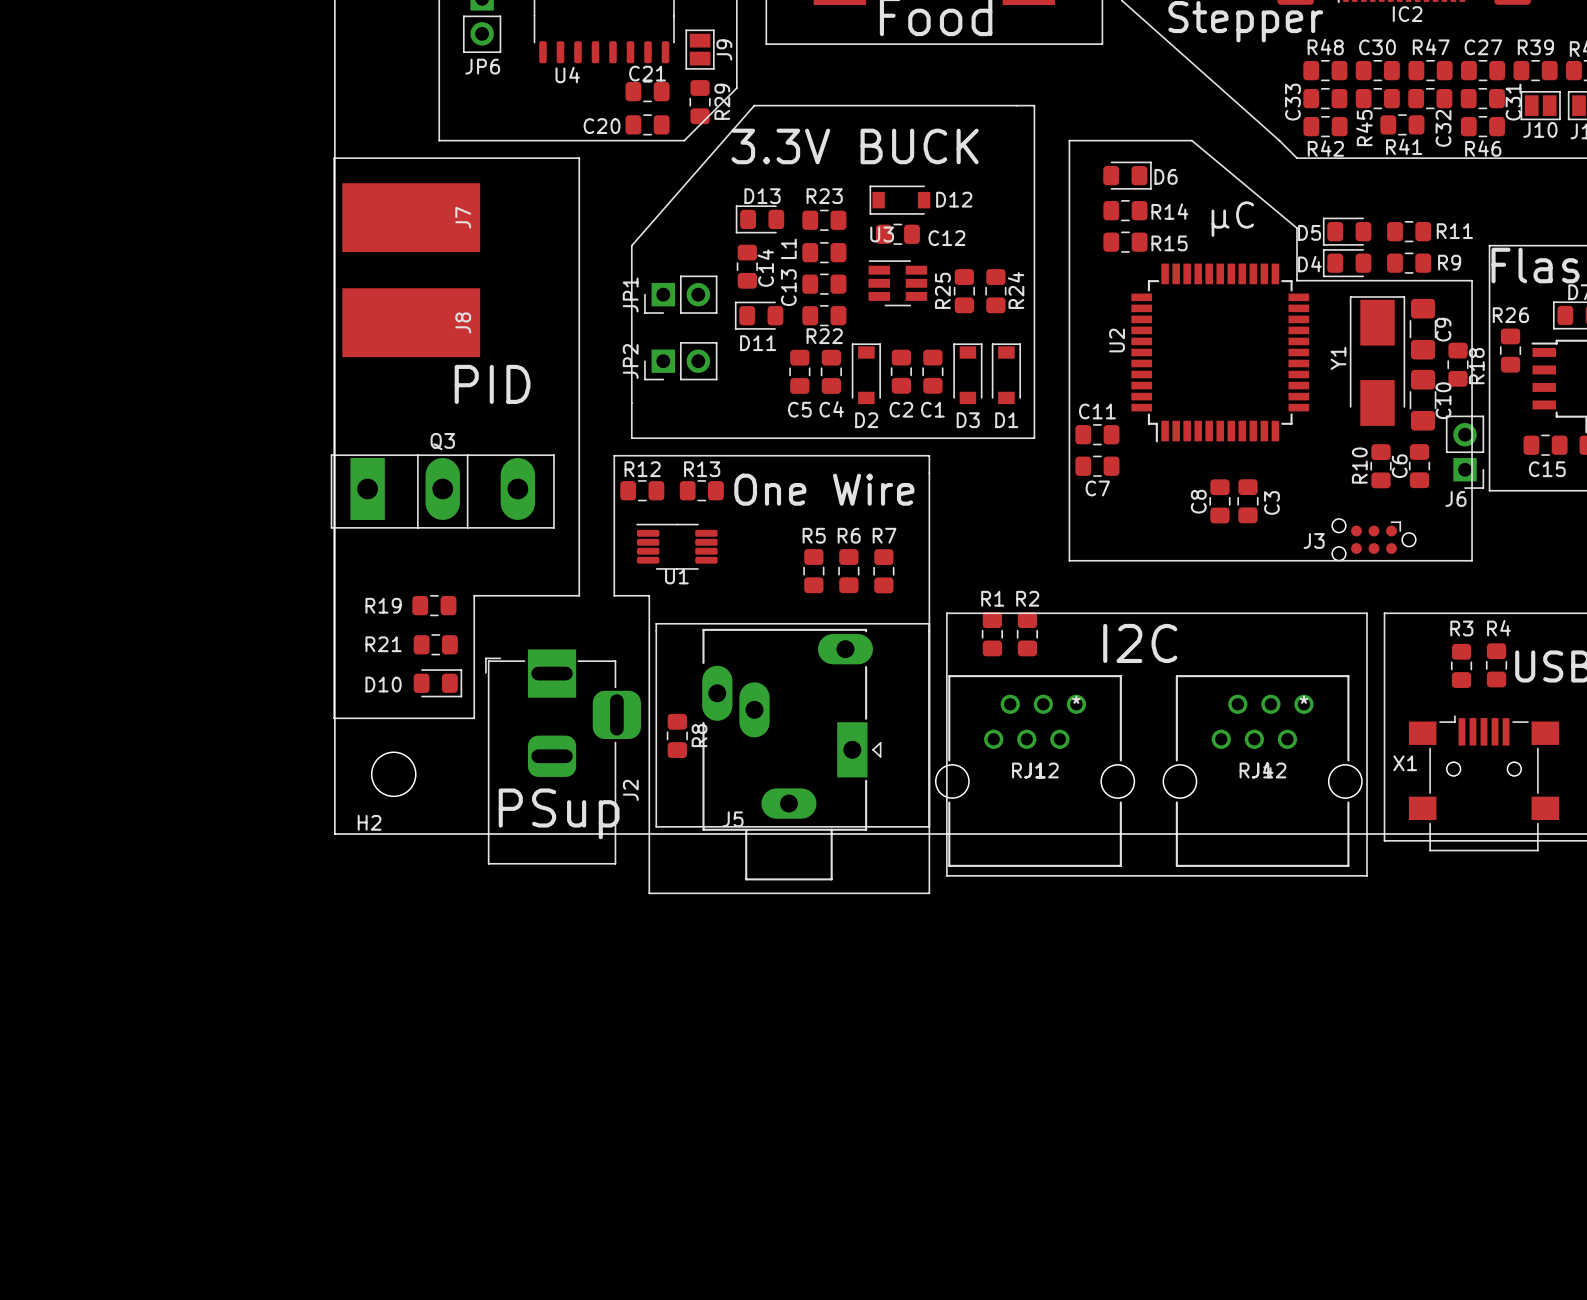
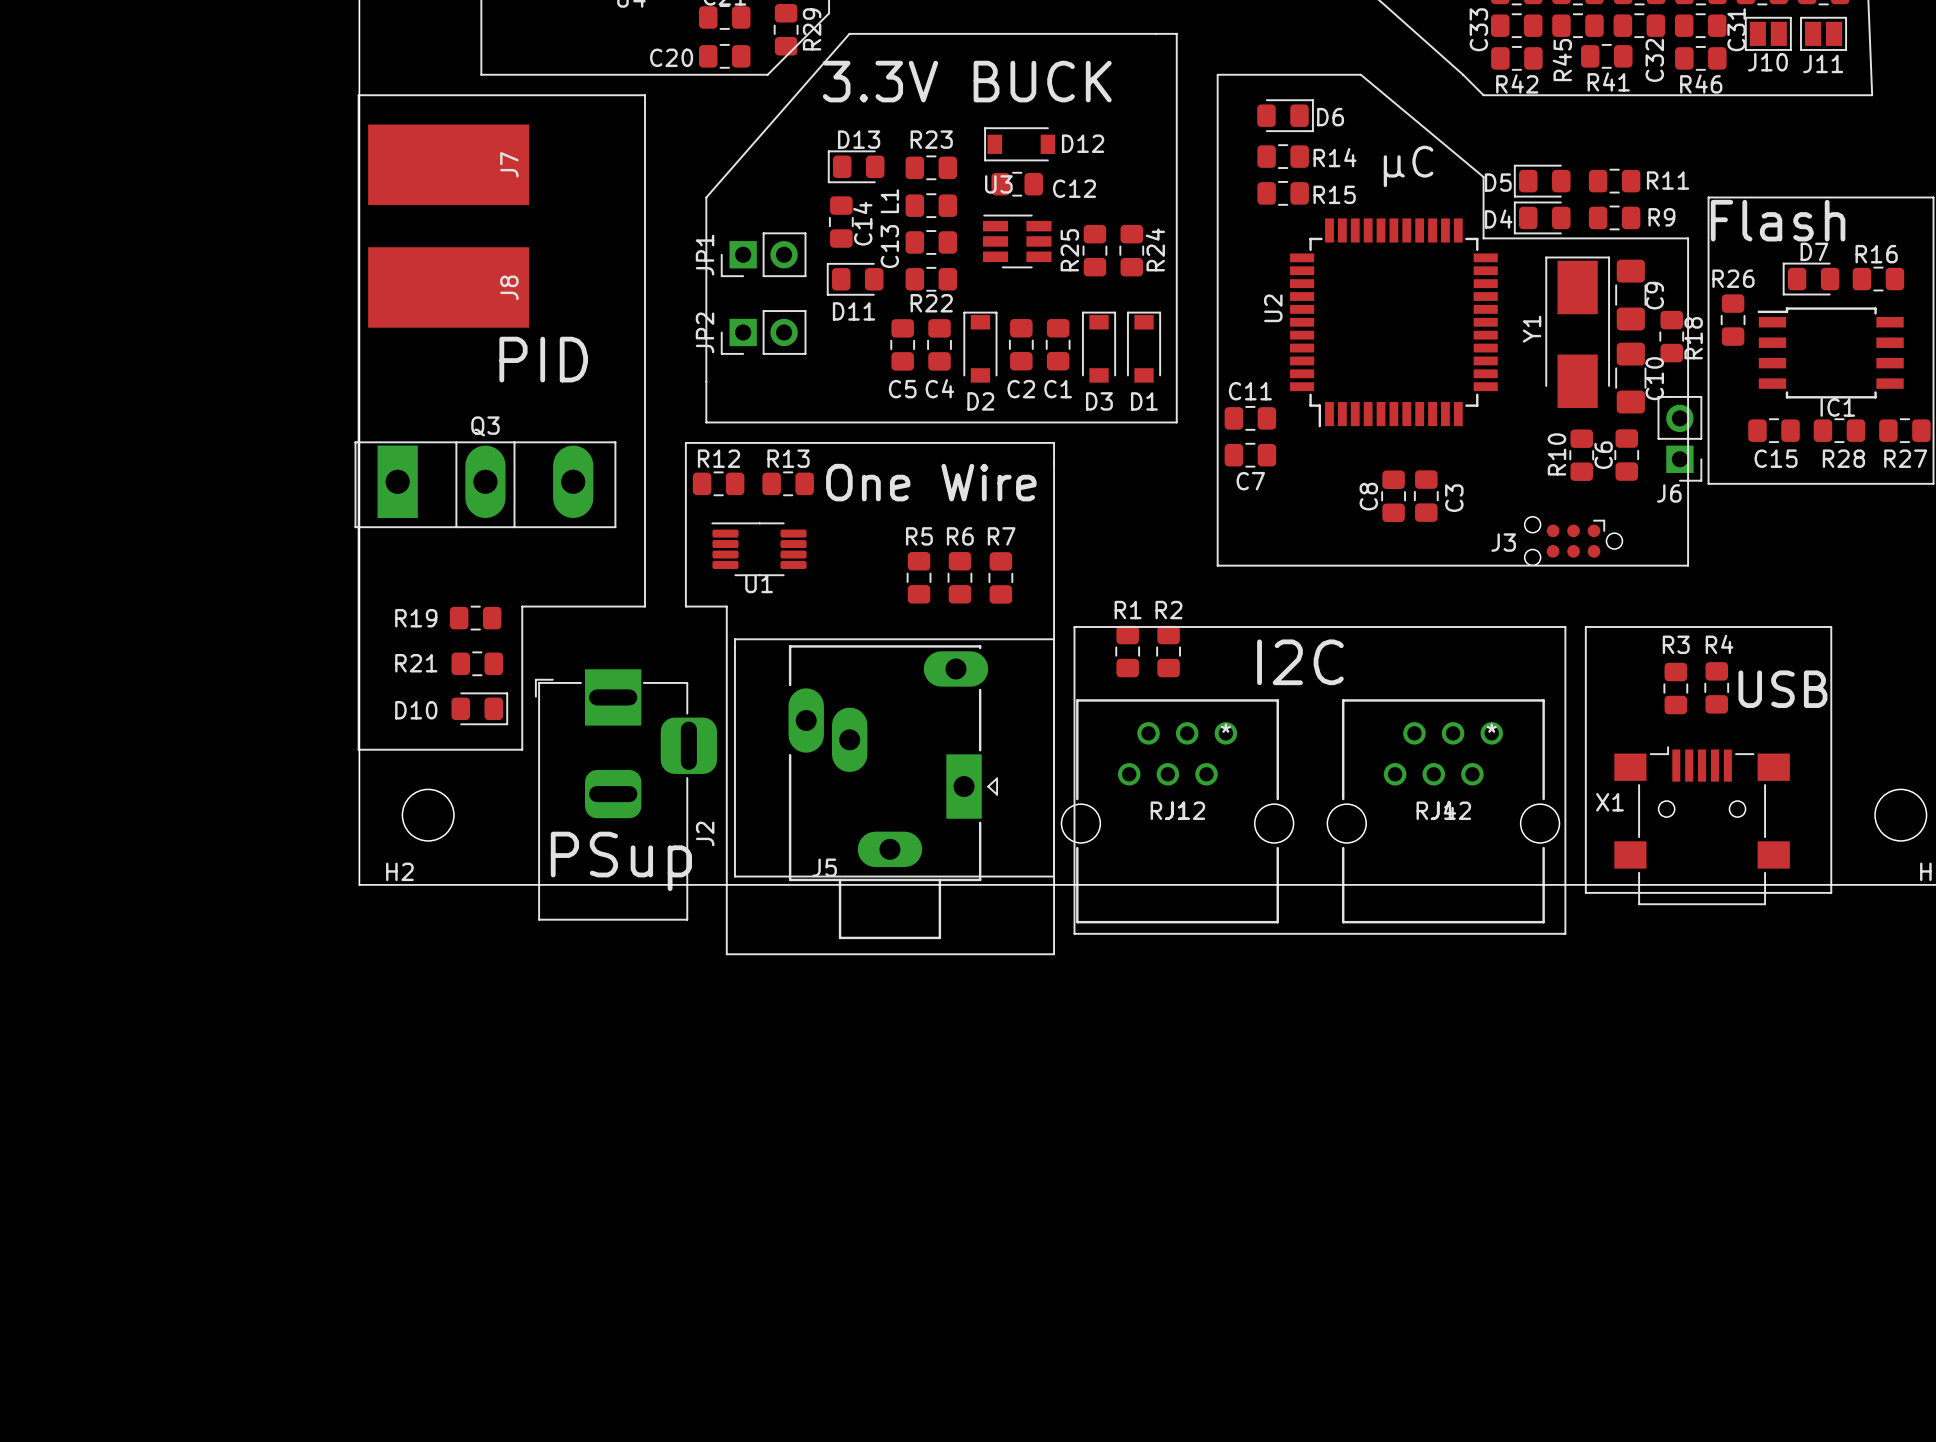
R8: (677, 735) -> none

